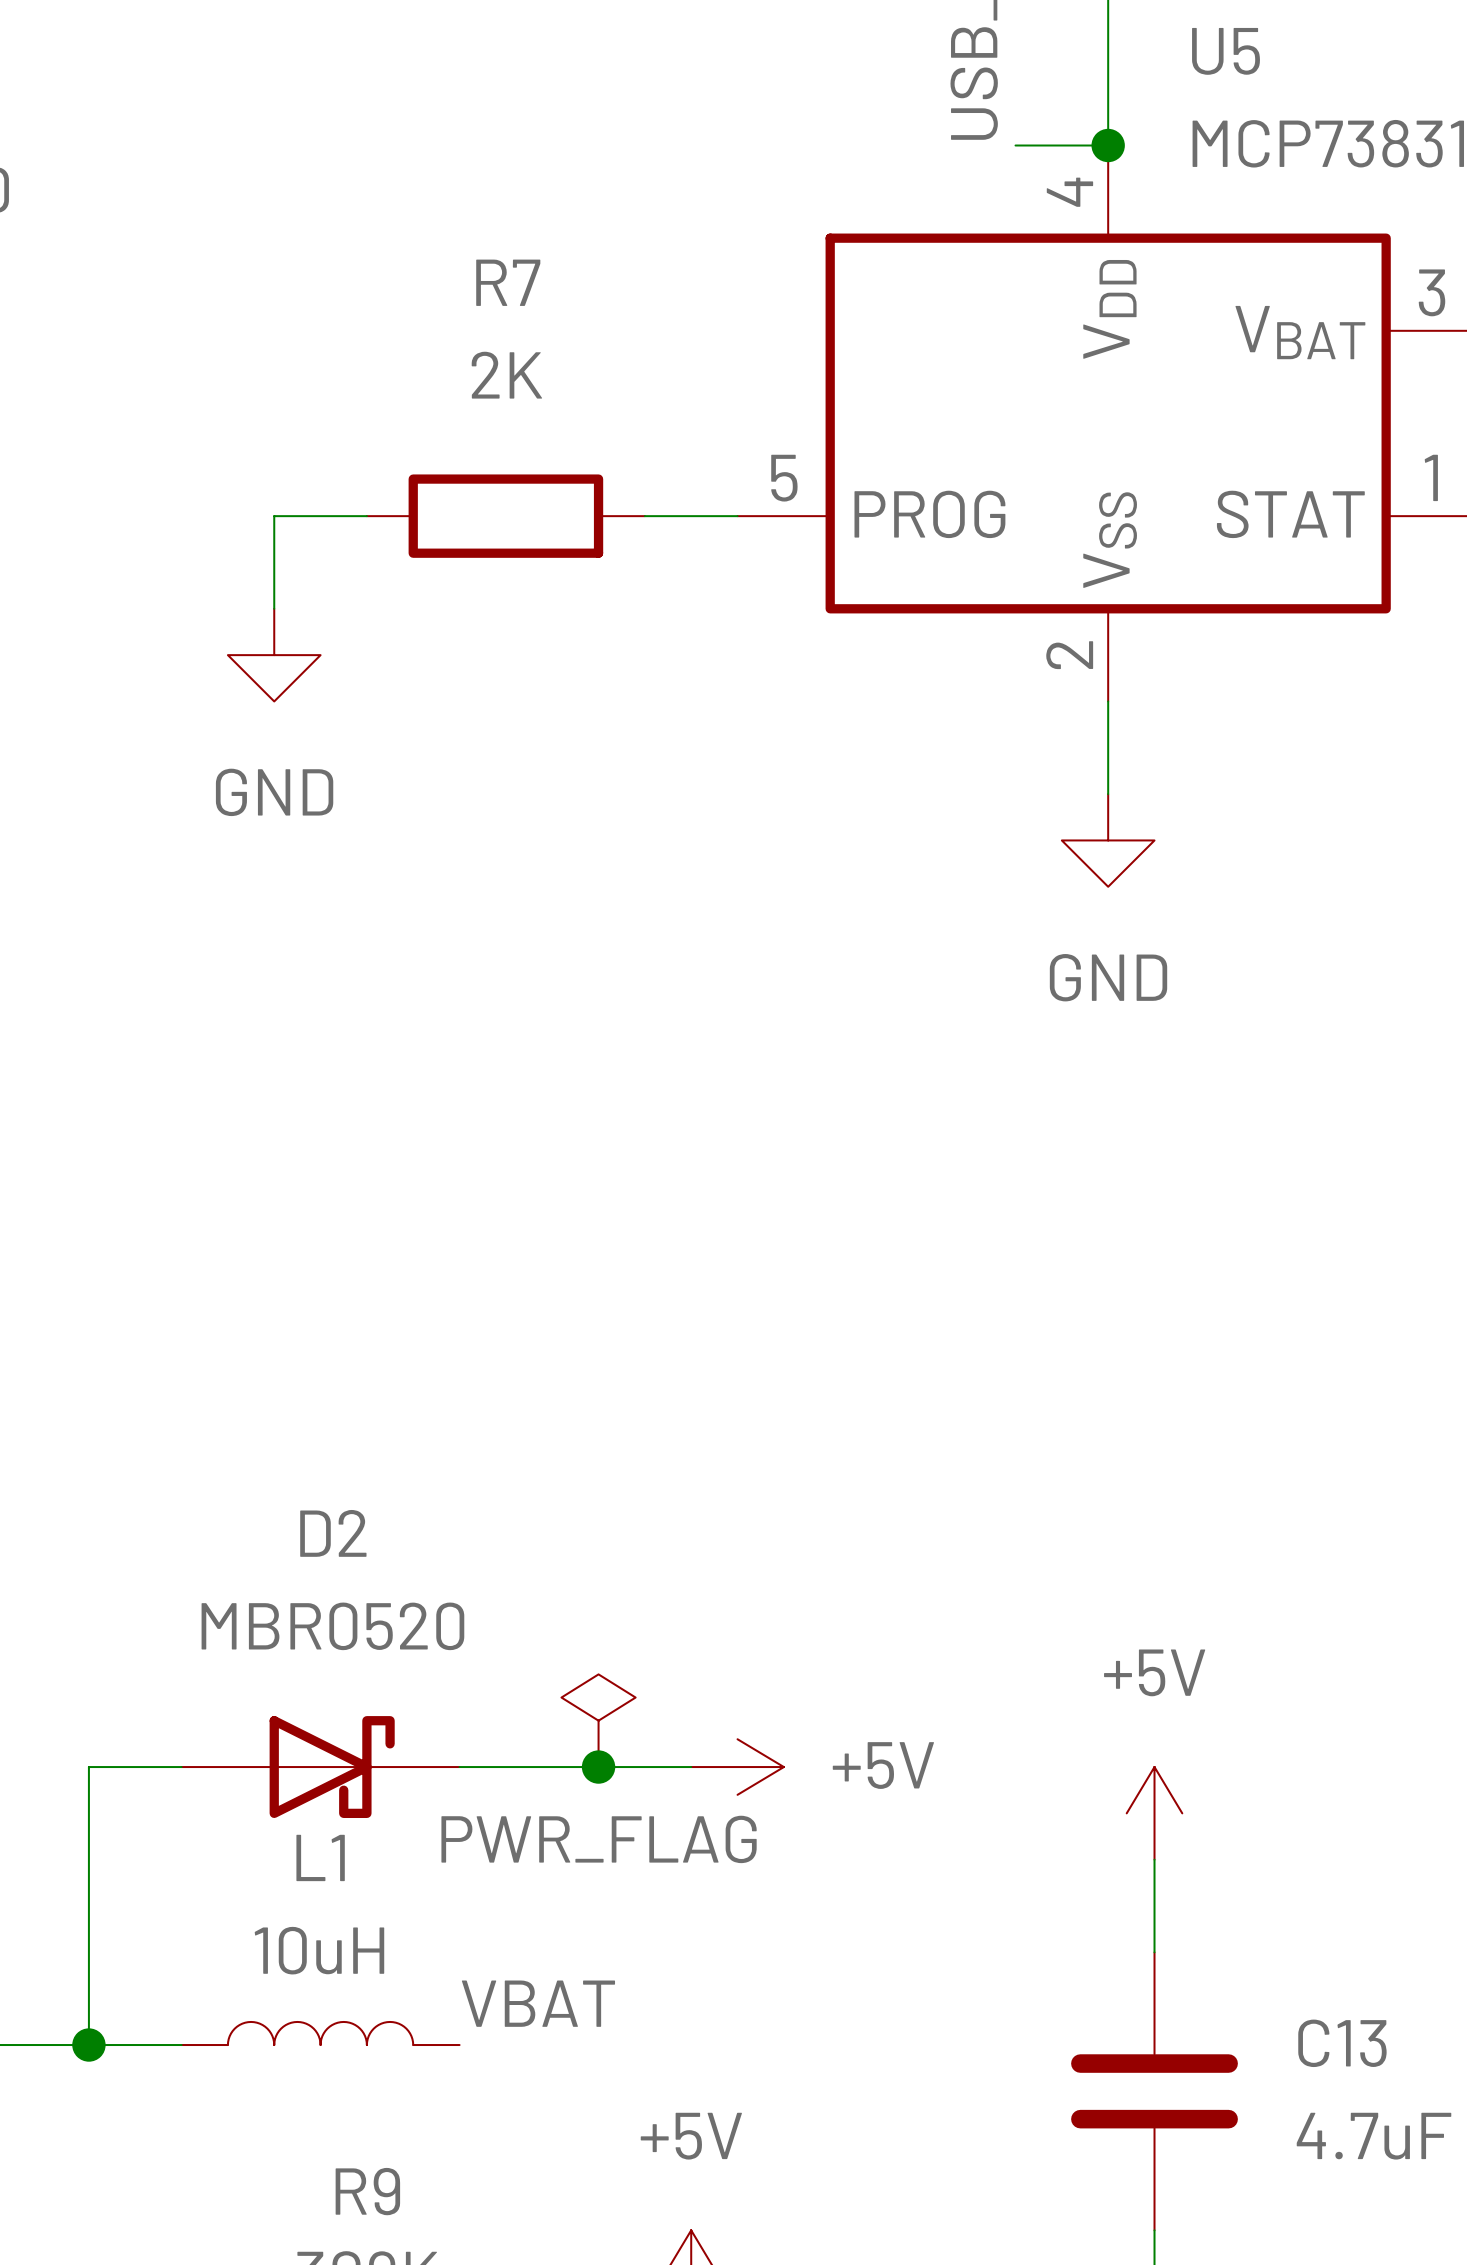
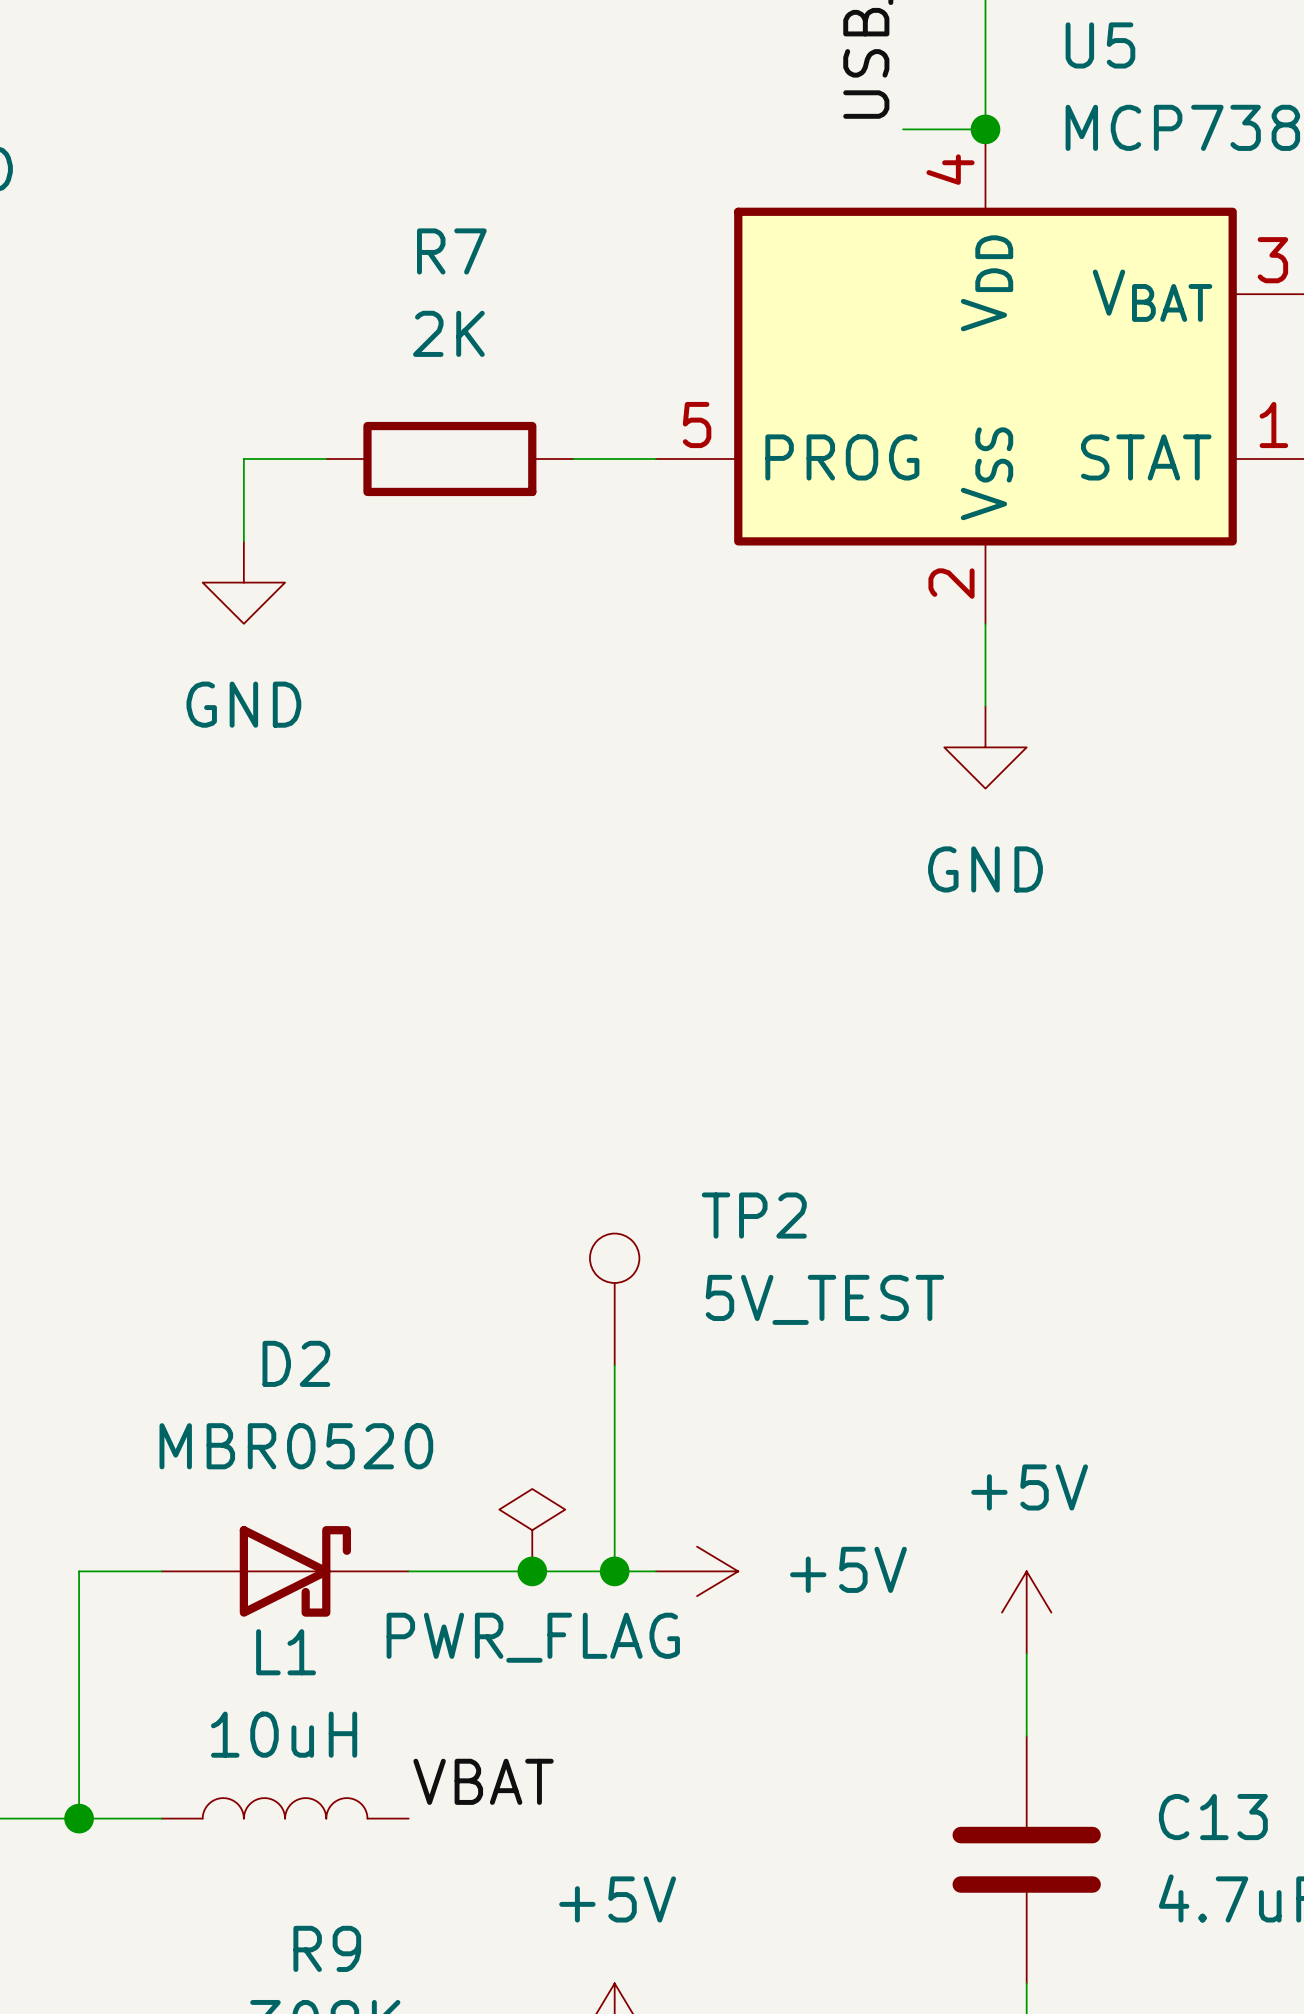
TP2: none -> 5V_TEST (614, 1299)
wire: none -> (614, 1365) (614, 1571) (655, 1571)
junction: none -> (614, 1571)
power symbol position: +5V (737, 1767) -> +5V (697, 1571)

